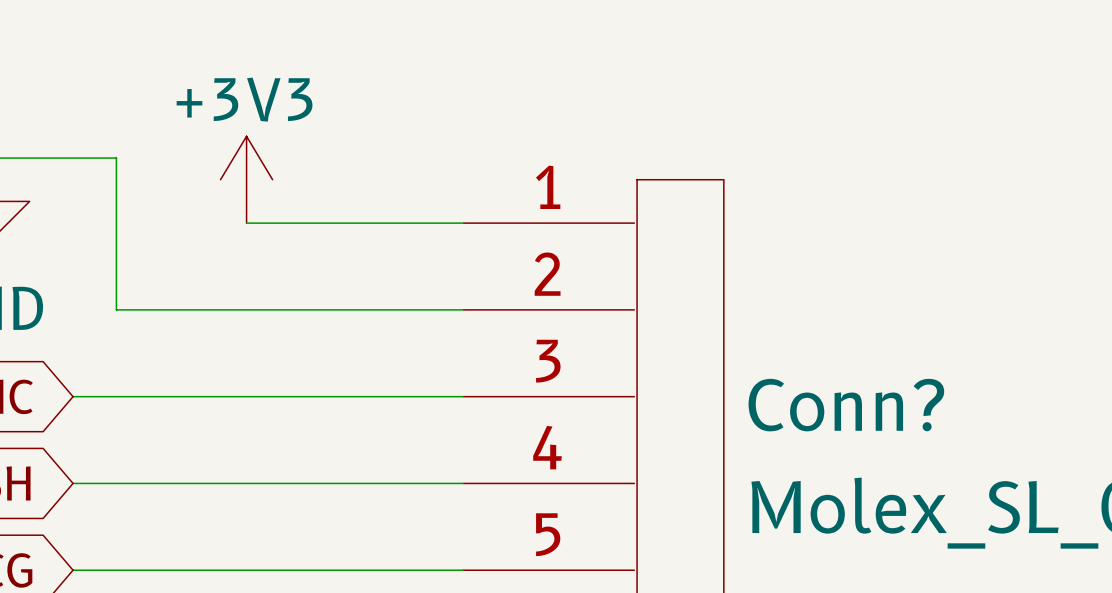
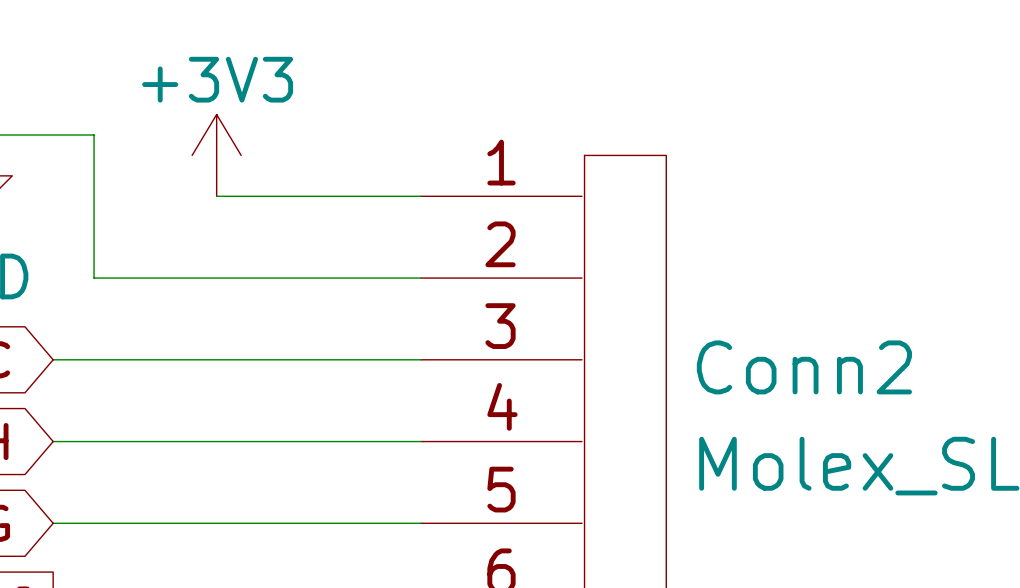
Conn? name: Conn? (846, 405) -> Conn2 (804, 367)

